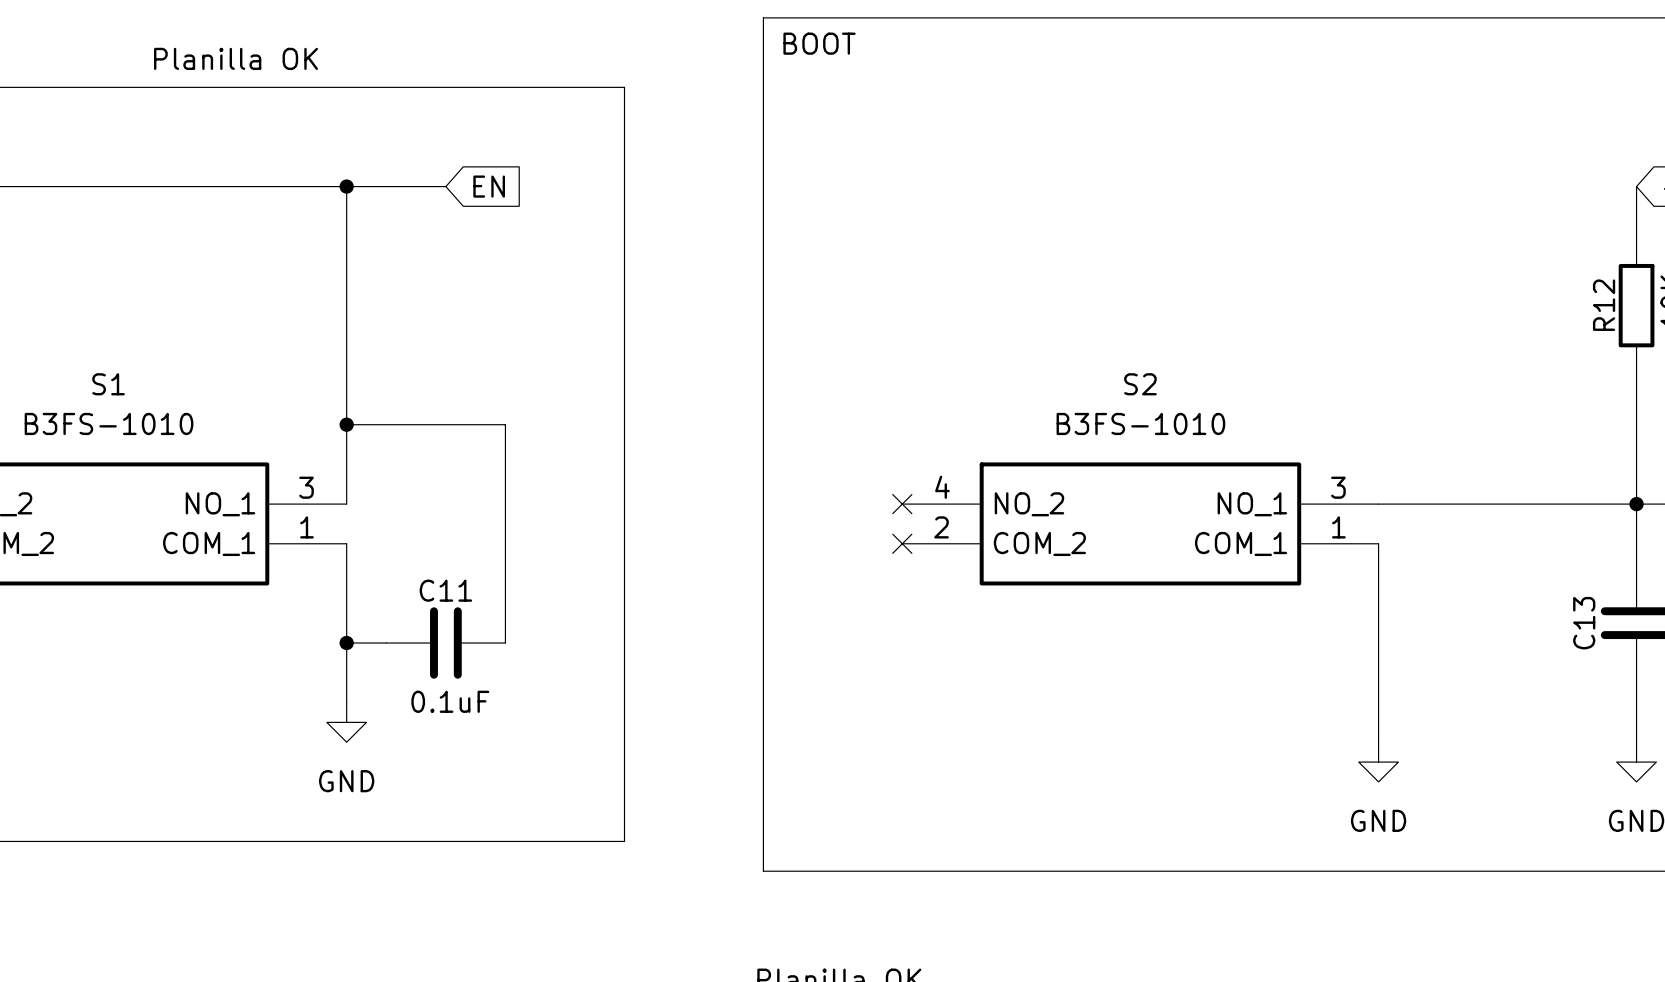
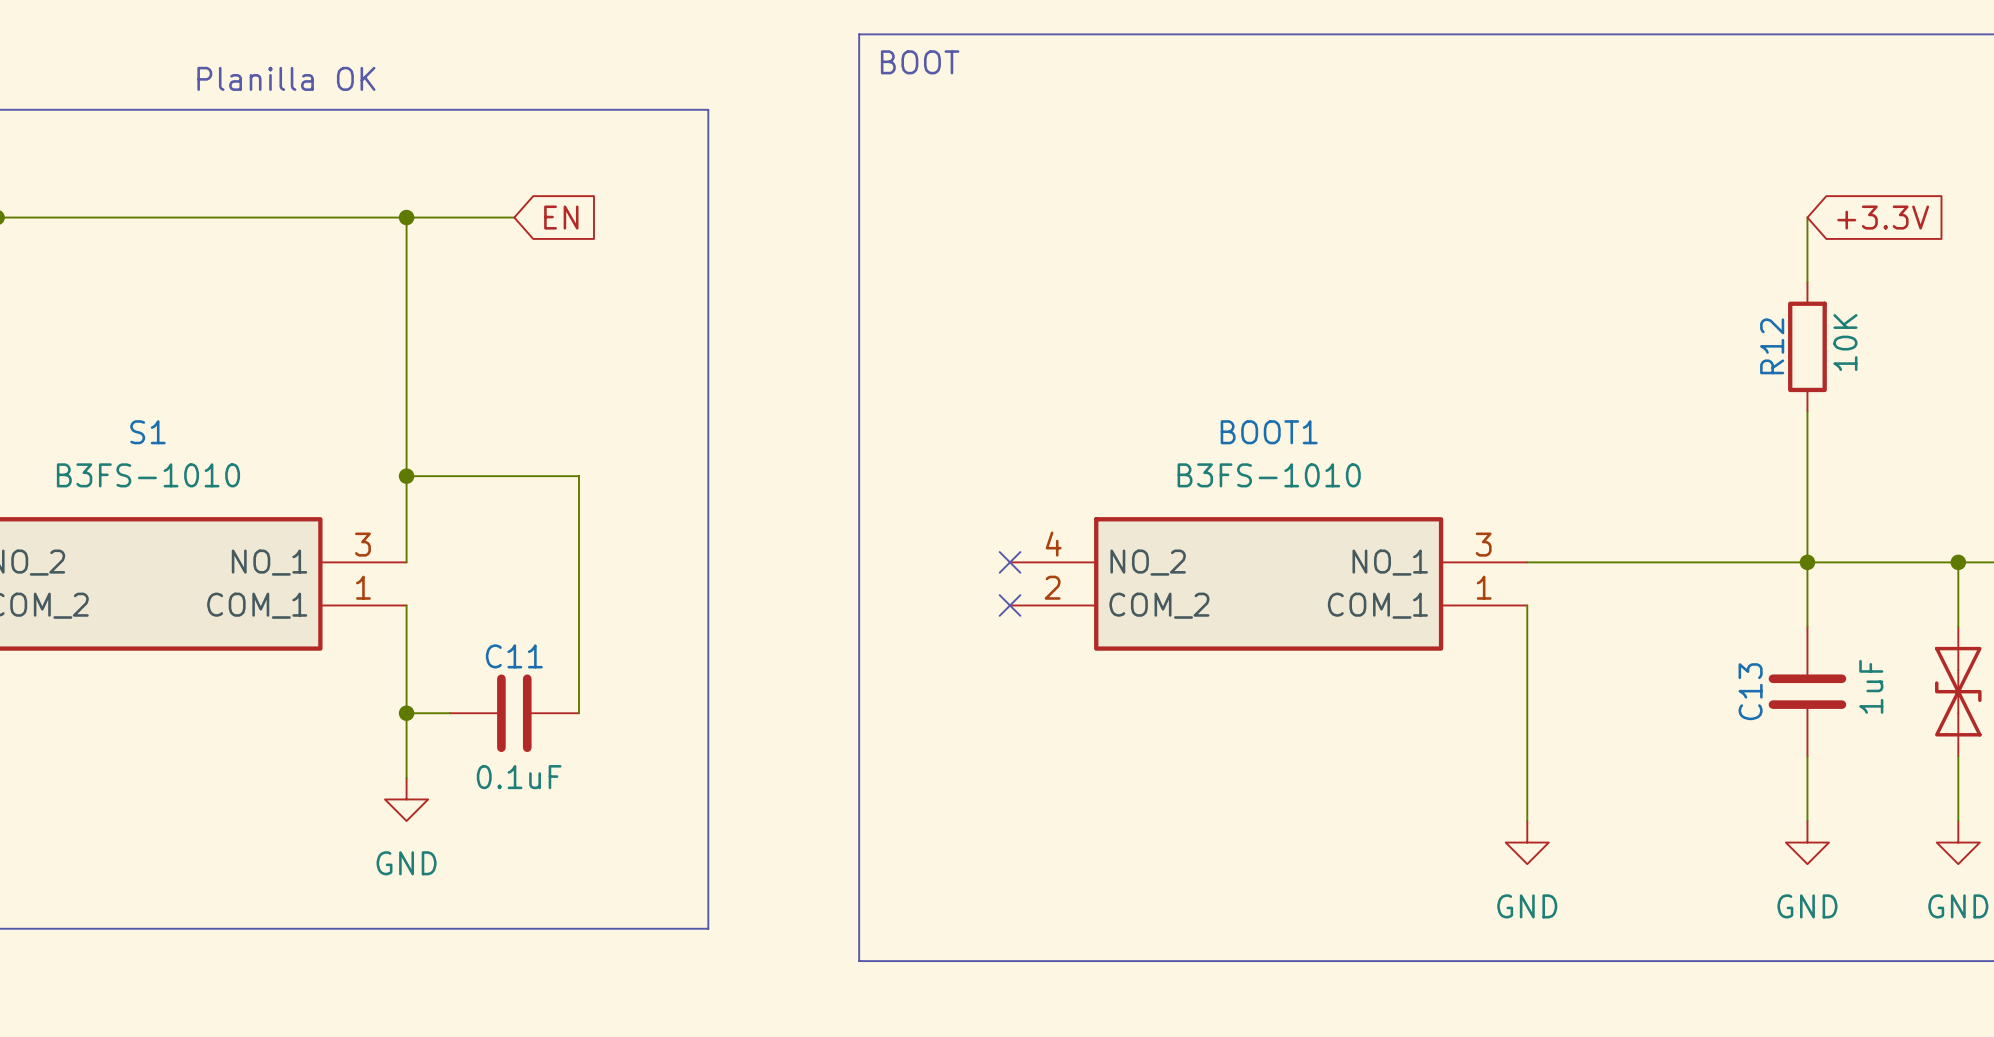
S2 name: S2 (1140, 384) -> BOOT1 (1269, 432)

